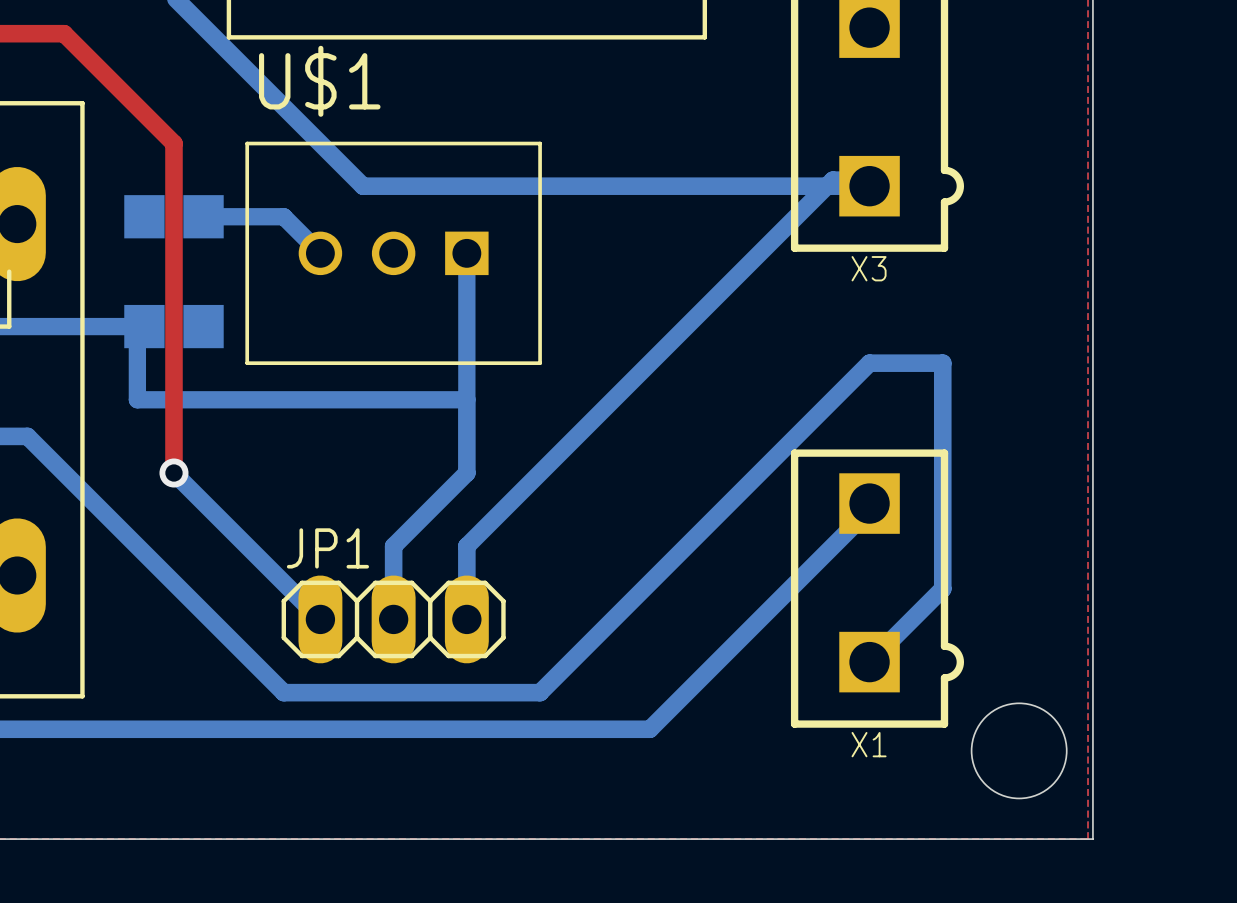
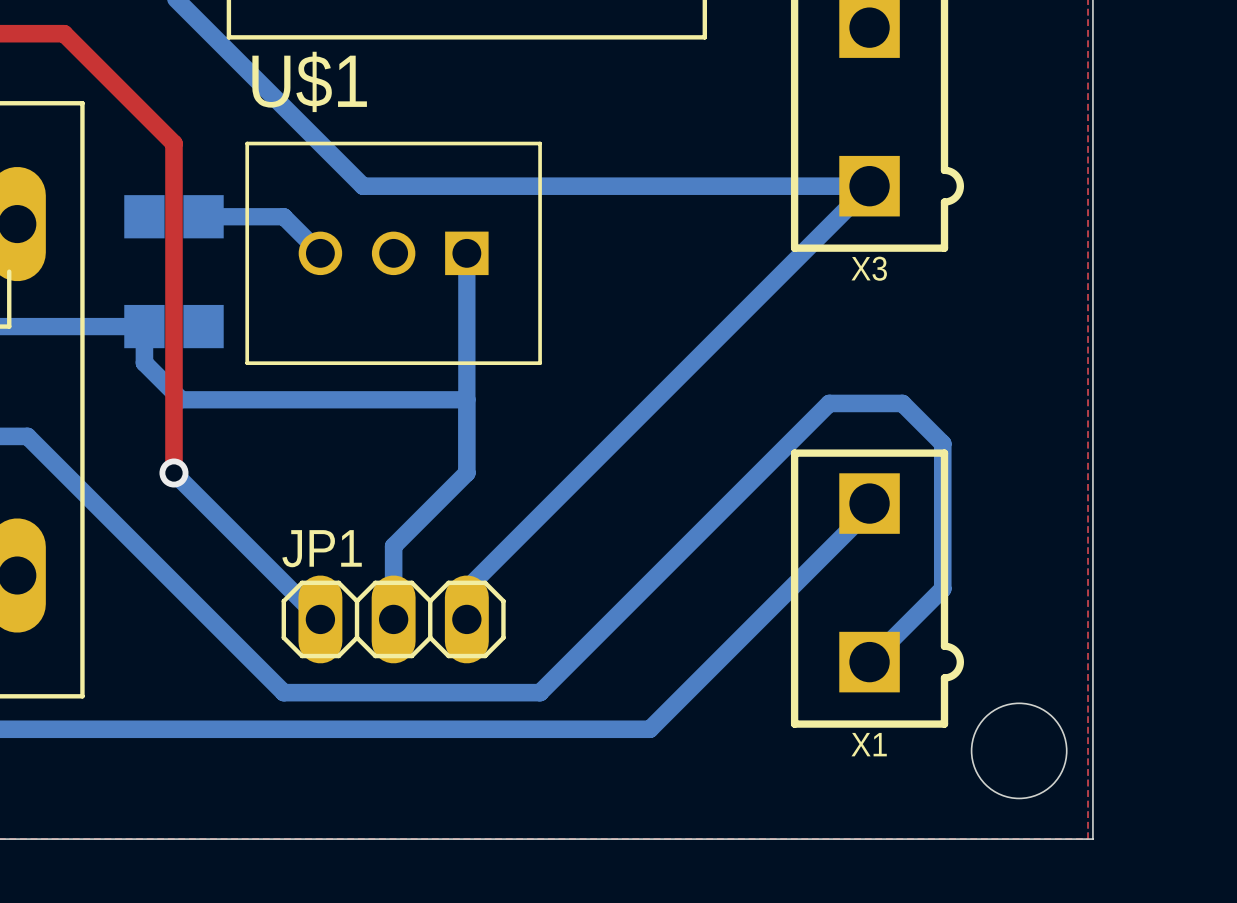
bottom track: (869, 186) (863, 180) (832, 180) (466, 546) (466, 588) -> (869, 186) (466, 588)
bottom track: (144, 326) (137, 333) (137, 399) (181, 399) -> (144, 326) (144, 362) (181, 399)
bottom track: (829, 403) (869, 363) (942, 363) (942, 443) -> (829, 403) (902, 403) (942, 443)

